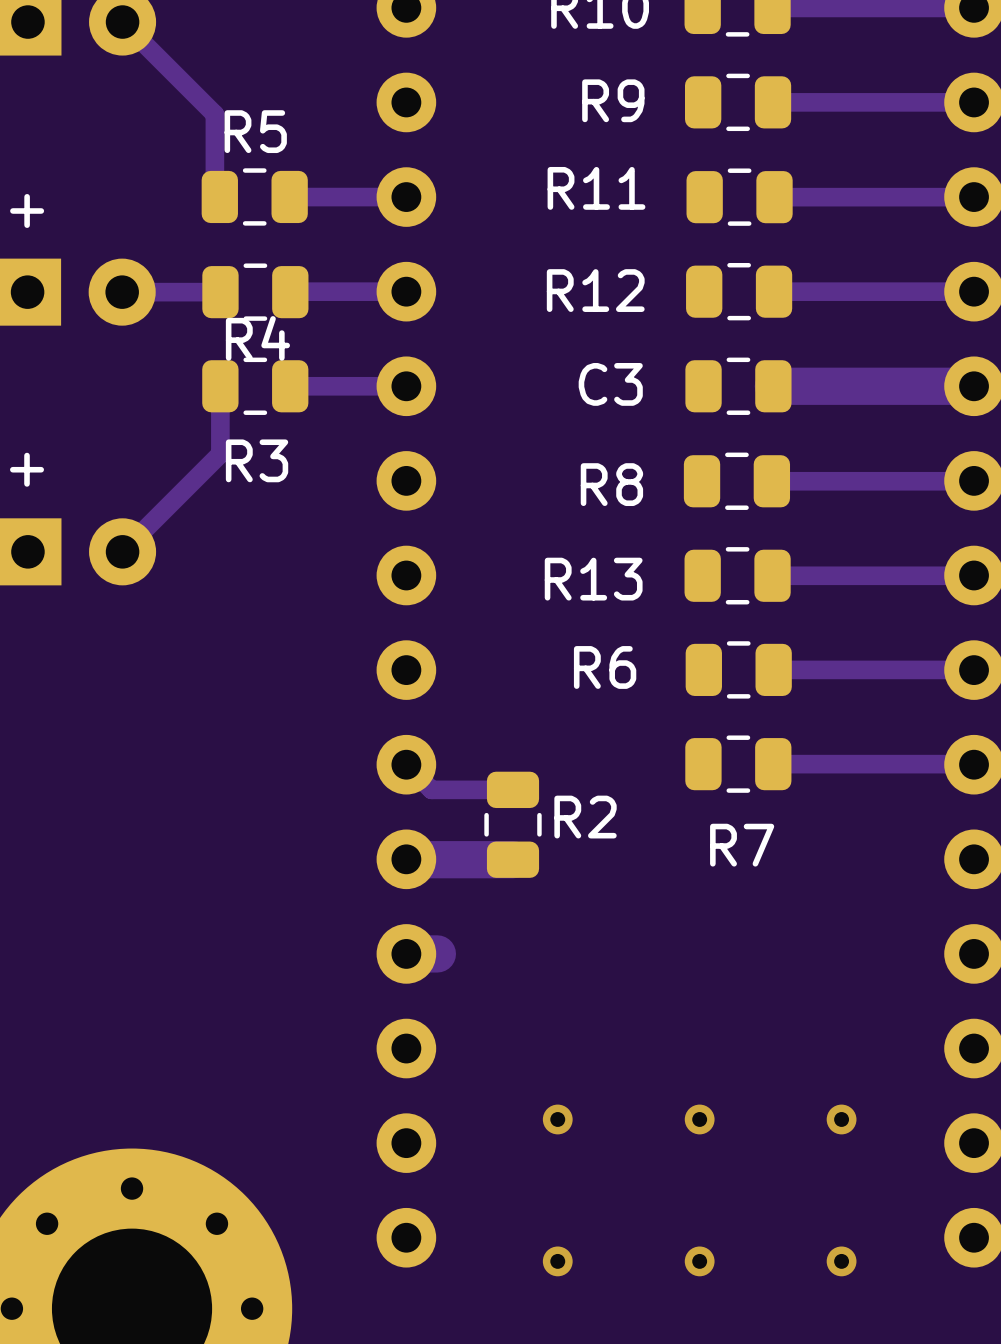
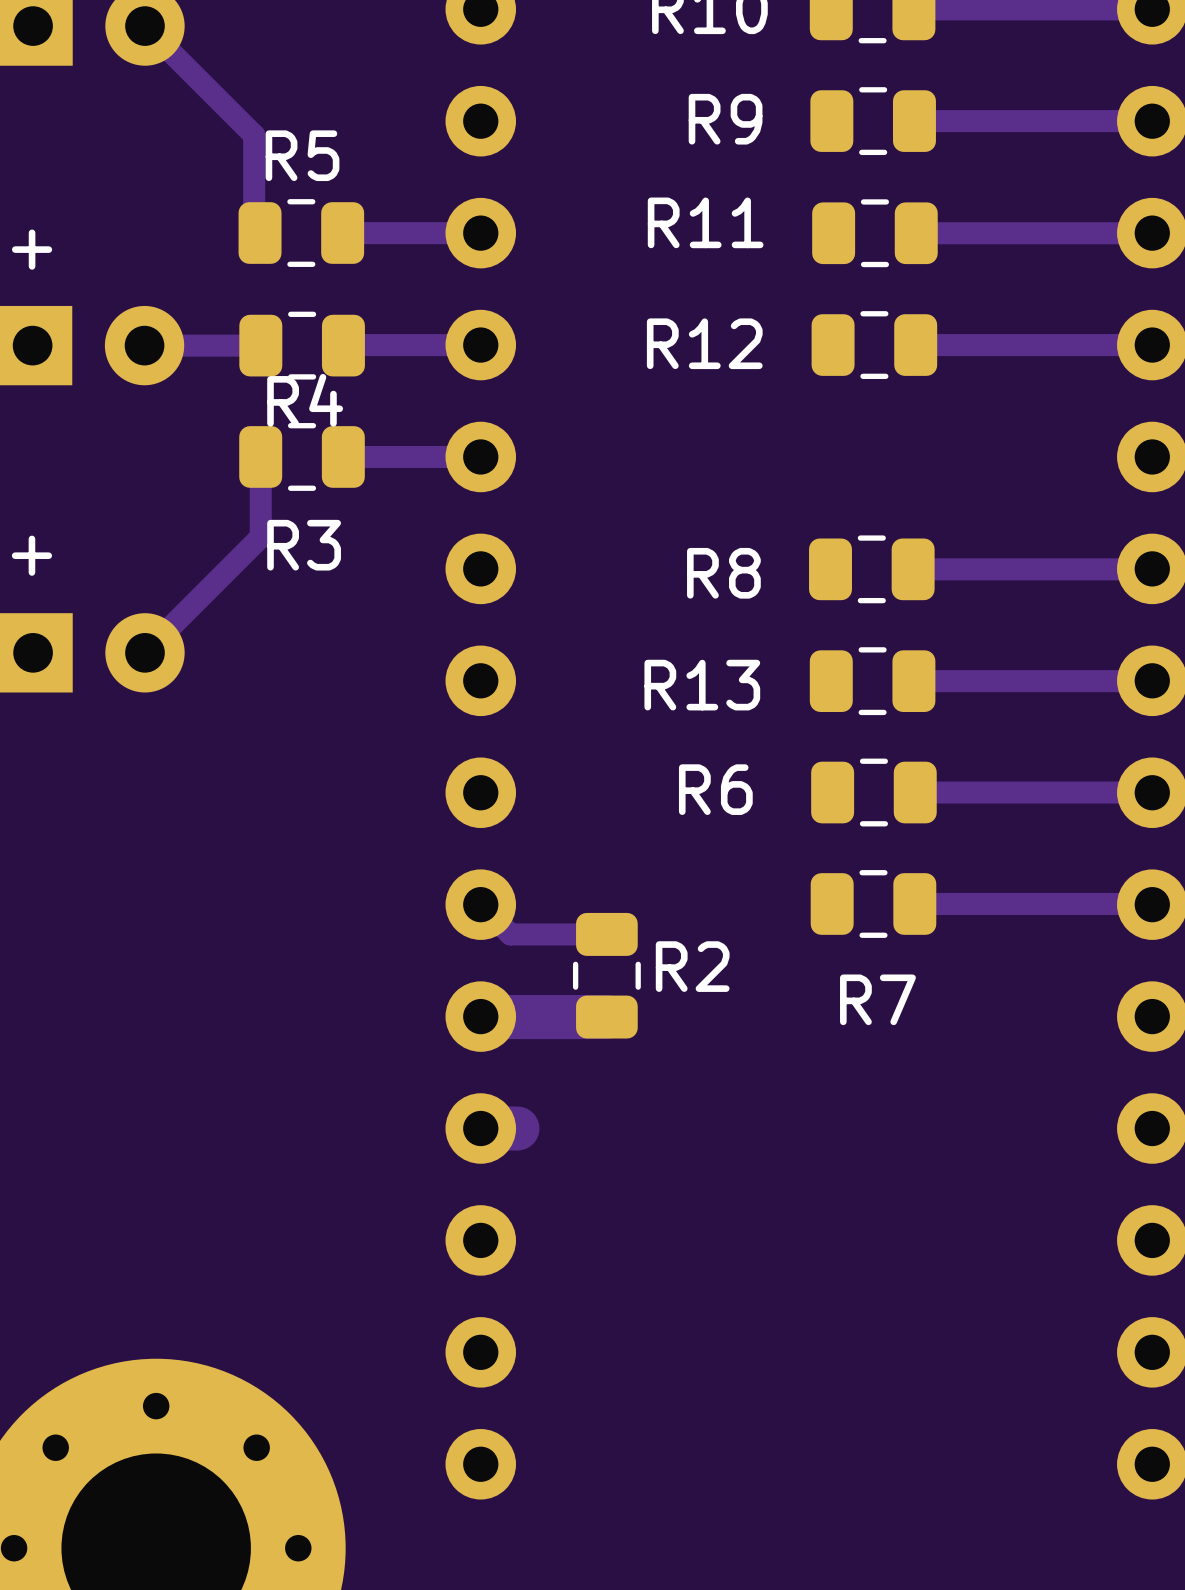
C3: (738, 386) -> none
track: (974, 386) (773, 386) -> none
via: (557, 1119) -> none
via: (699, 1119) -> none
via: (841, 1119) -> none
via: (557, 1261) -> none
via: (699, 1261) -> none
via: (841, 1261) -> none

